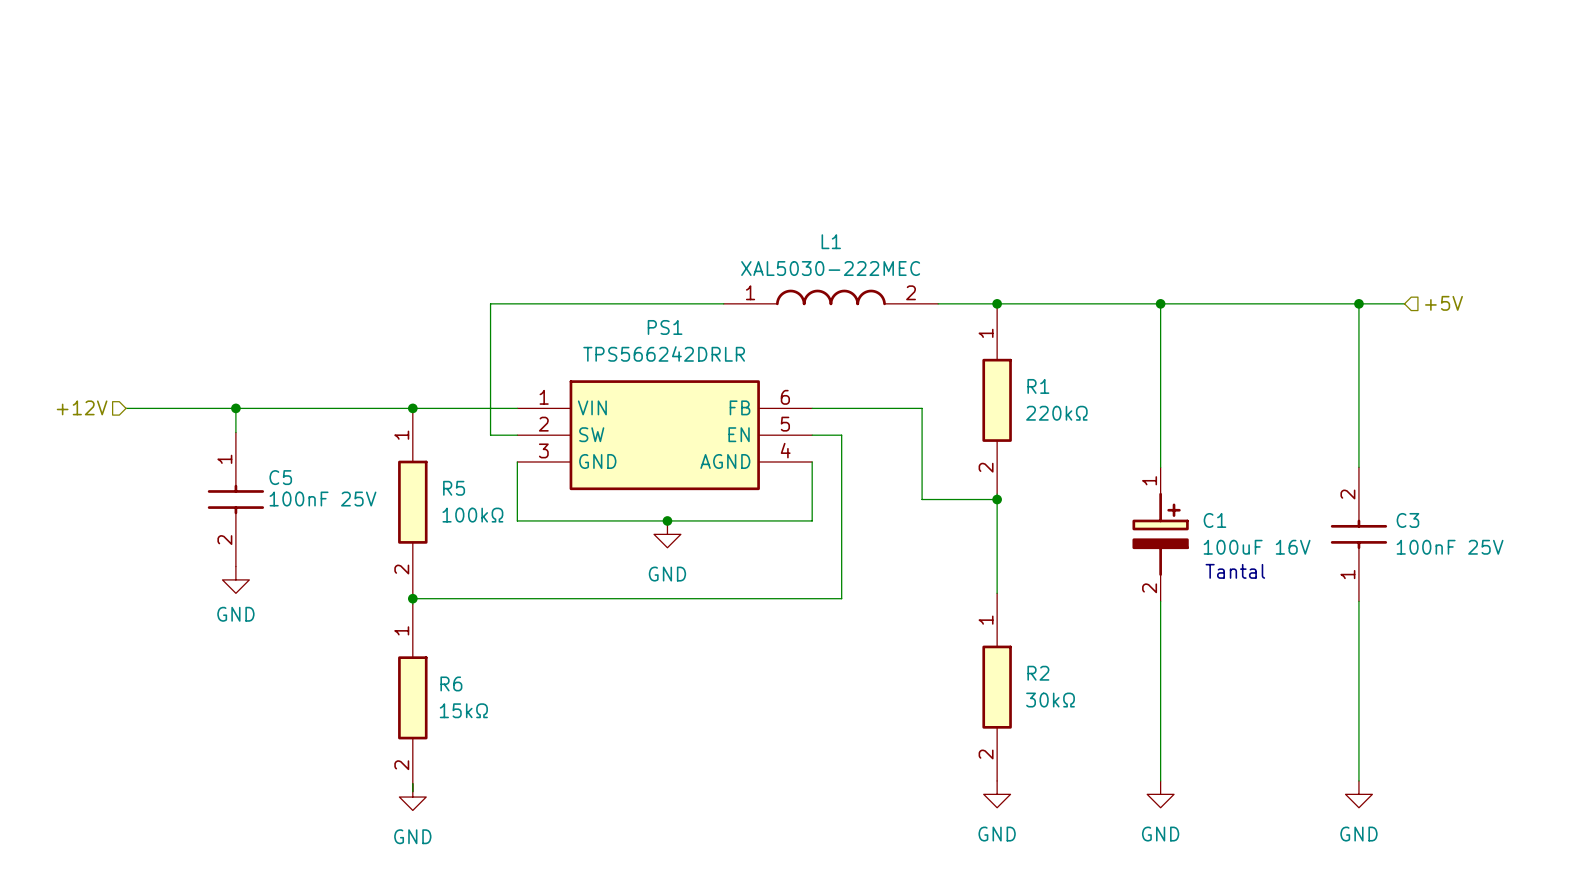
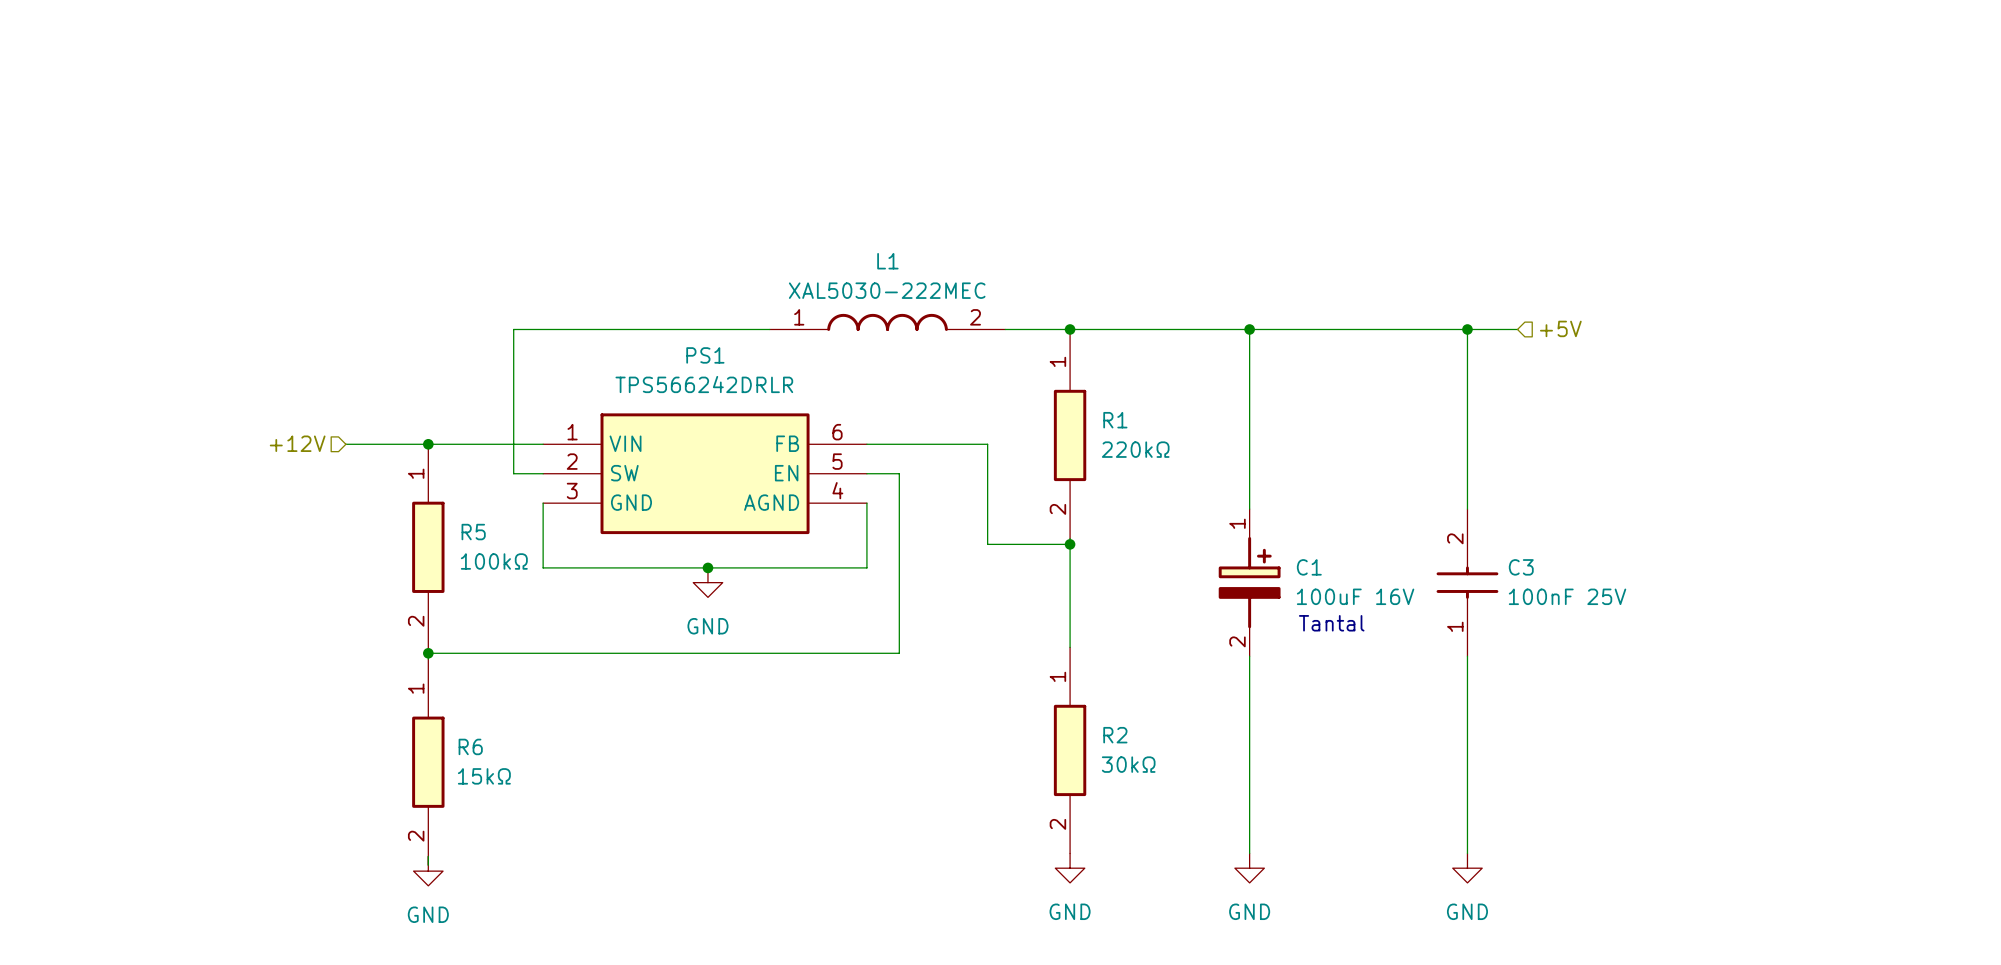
hierarchical label position: +12V (82, 407) -> +12V (297, 443)
wire: (126, 408) (337, 408) -> none
wire: (235, 408) (235, 432) -> none
junction: (235, 408) -> none
C5: 100nF 25V (235, 499) -> none
power symbol: GND (235, 579) -> none

